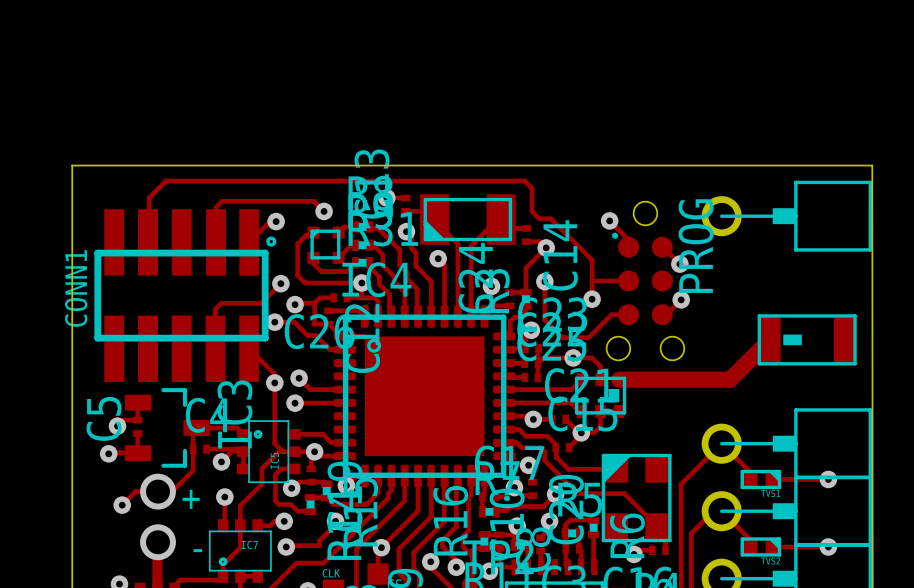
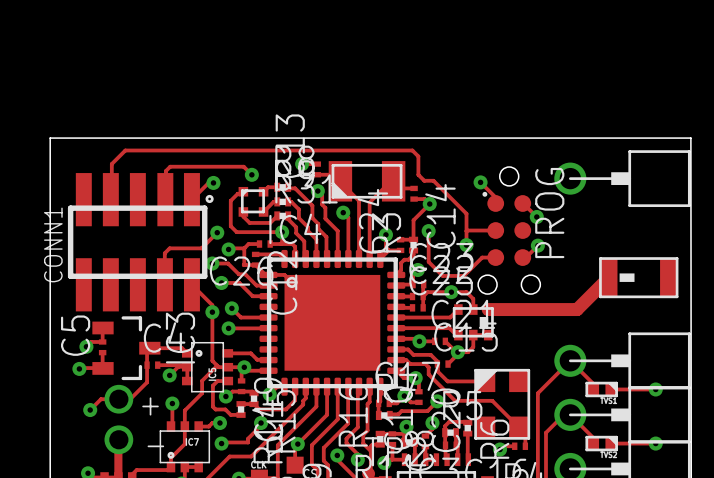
track: none -> (221, 282) (239, 282) (252, 296) (268, 296)
via: none -> (221, 282)

